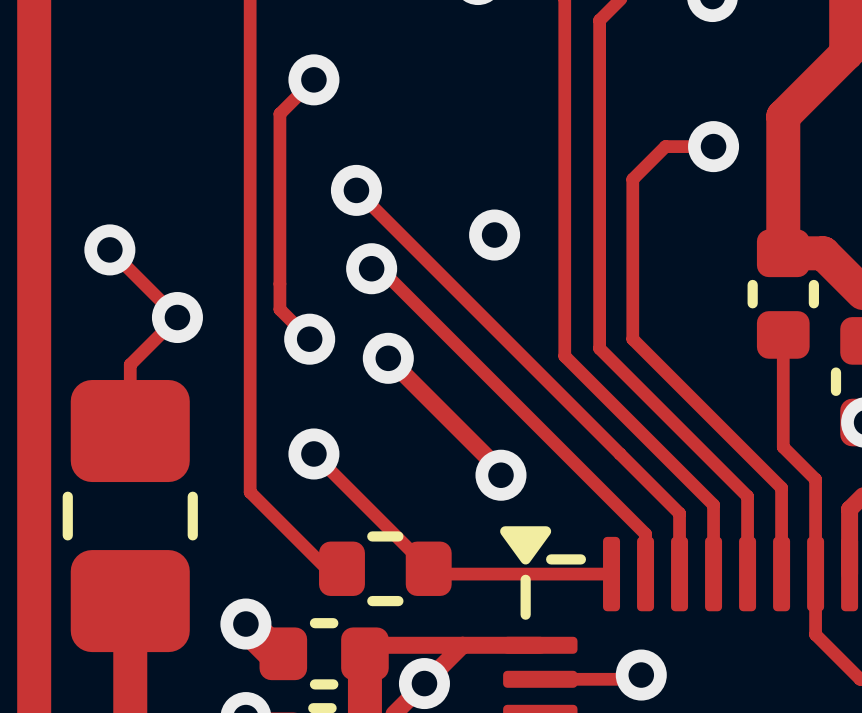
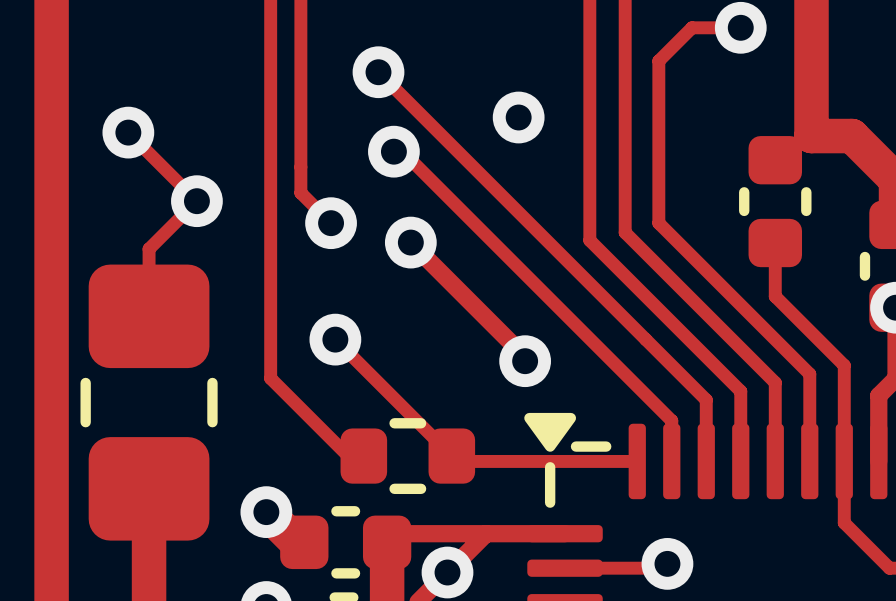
part position: (783, 294) -> (775, 201)
track: (783, 334) (783, 447) -> (775, 243) (775, 296) (811, 332)

